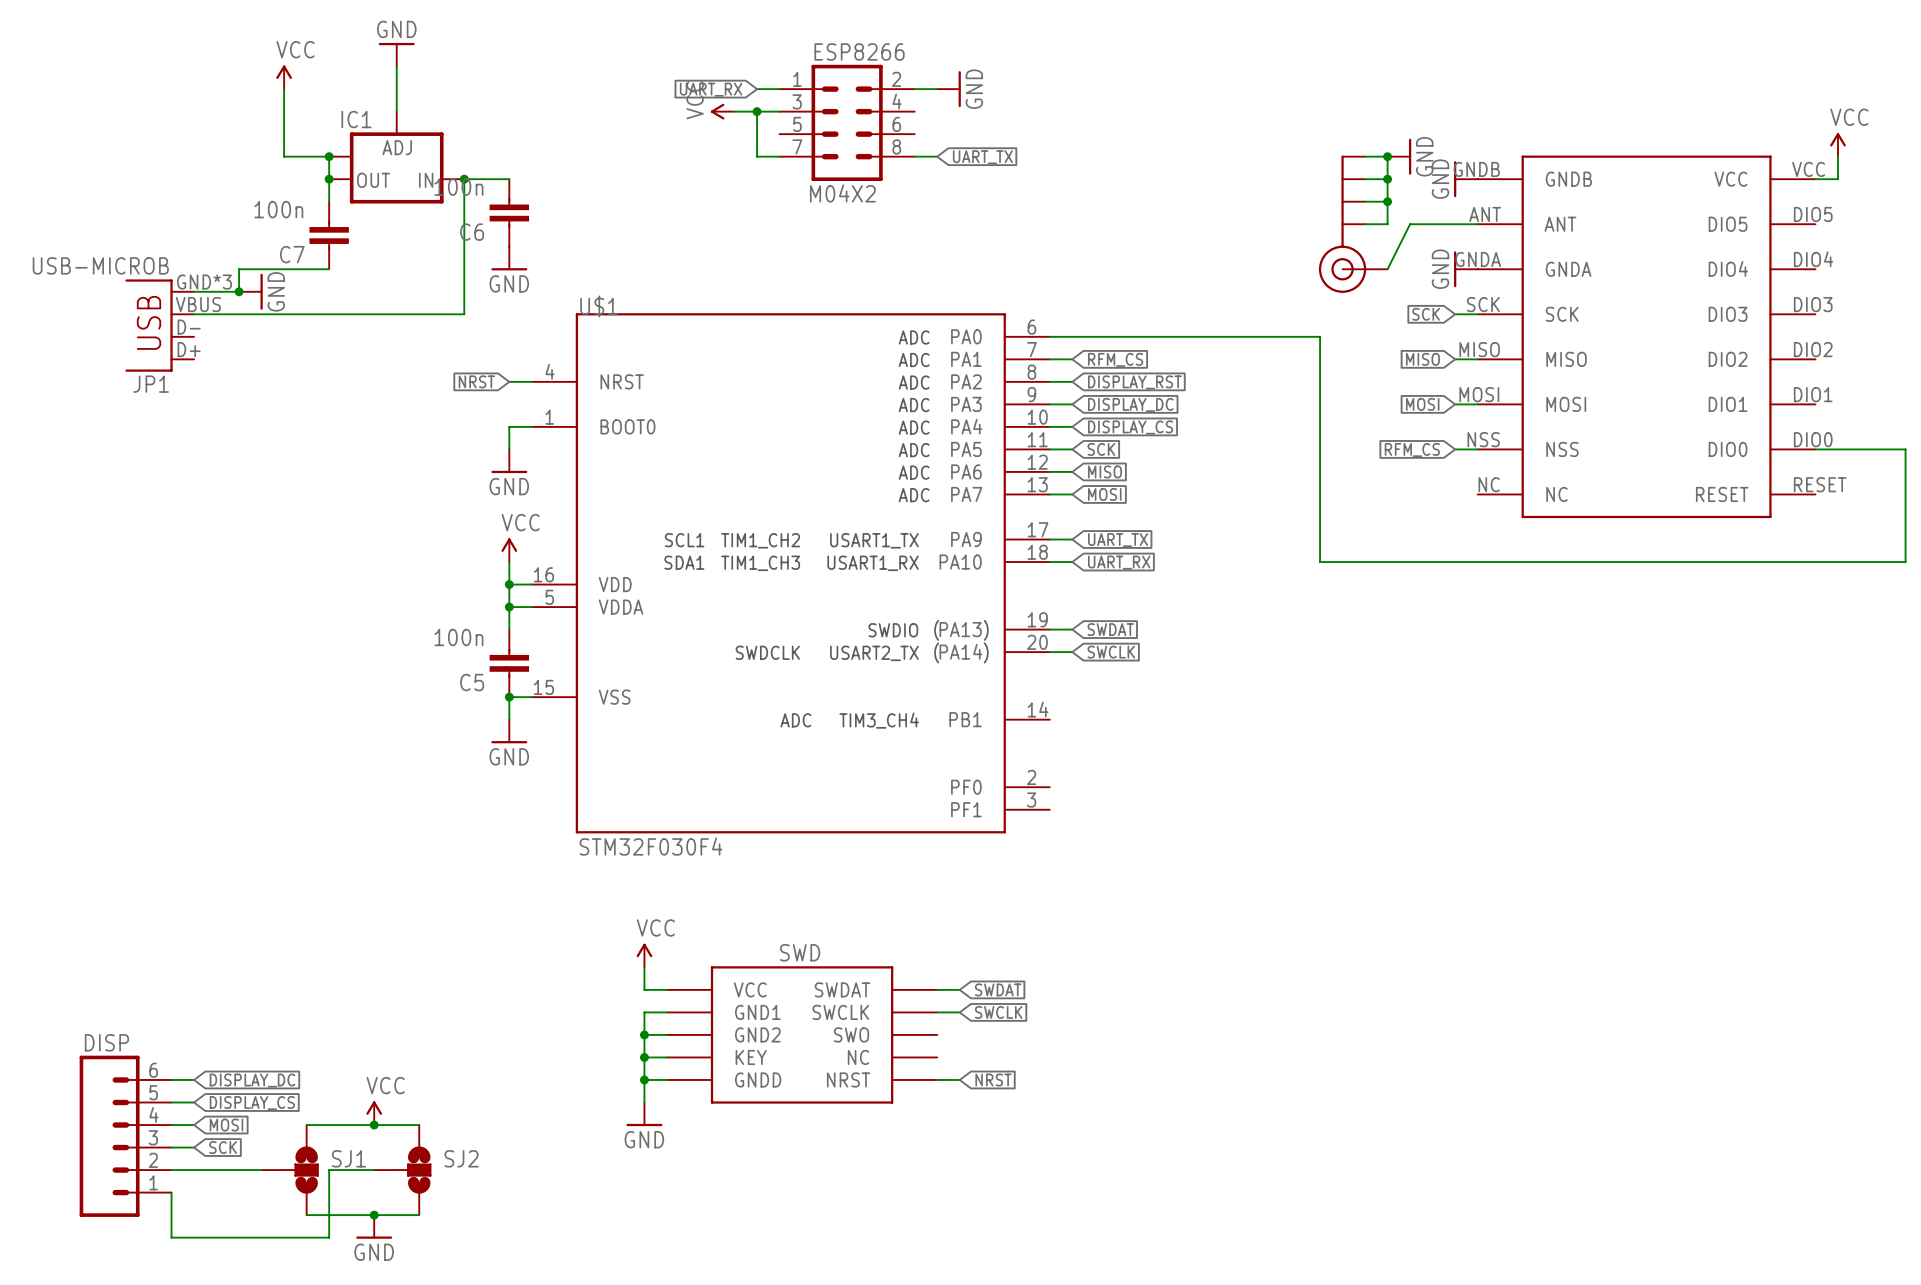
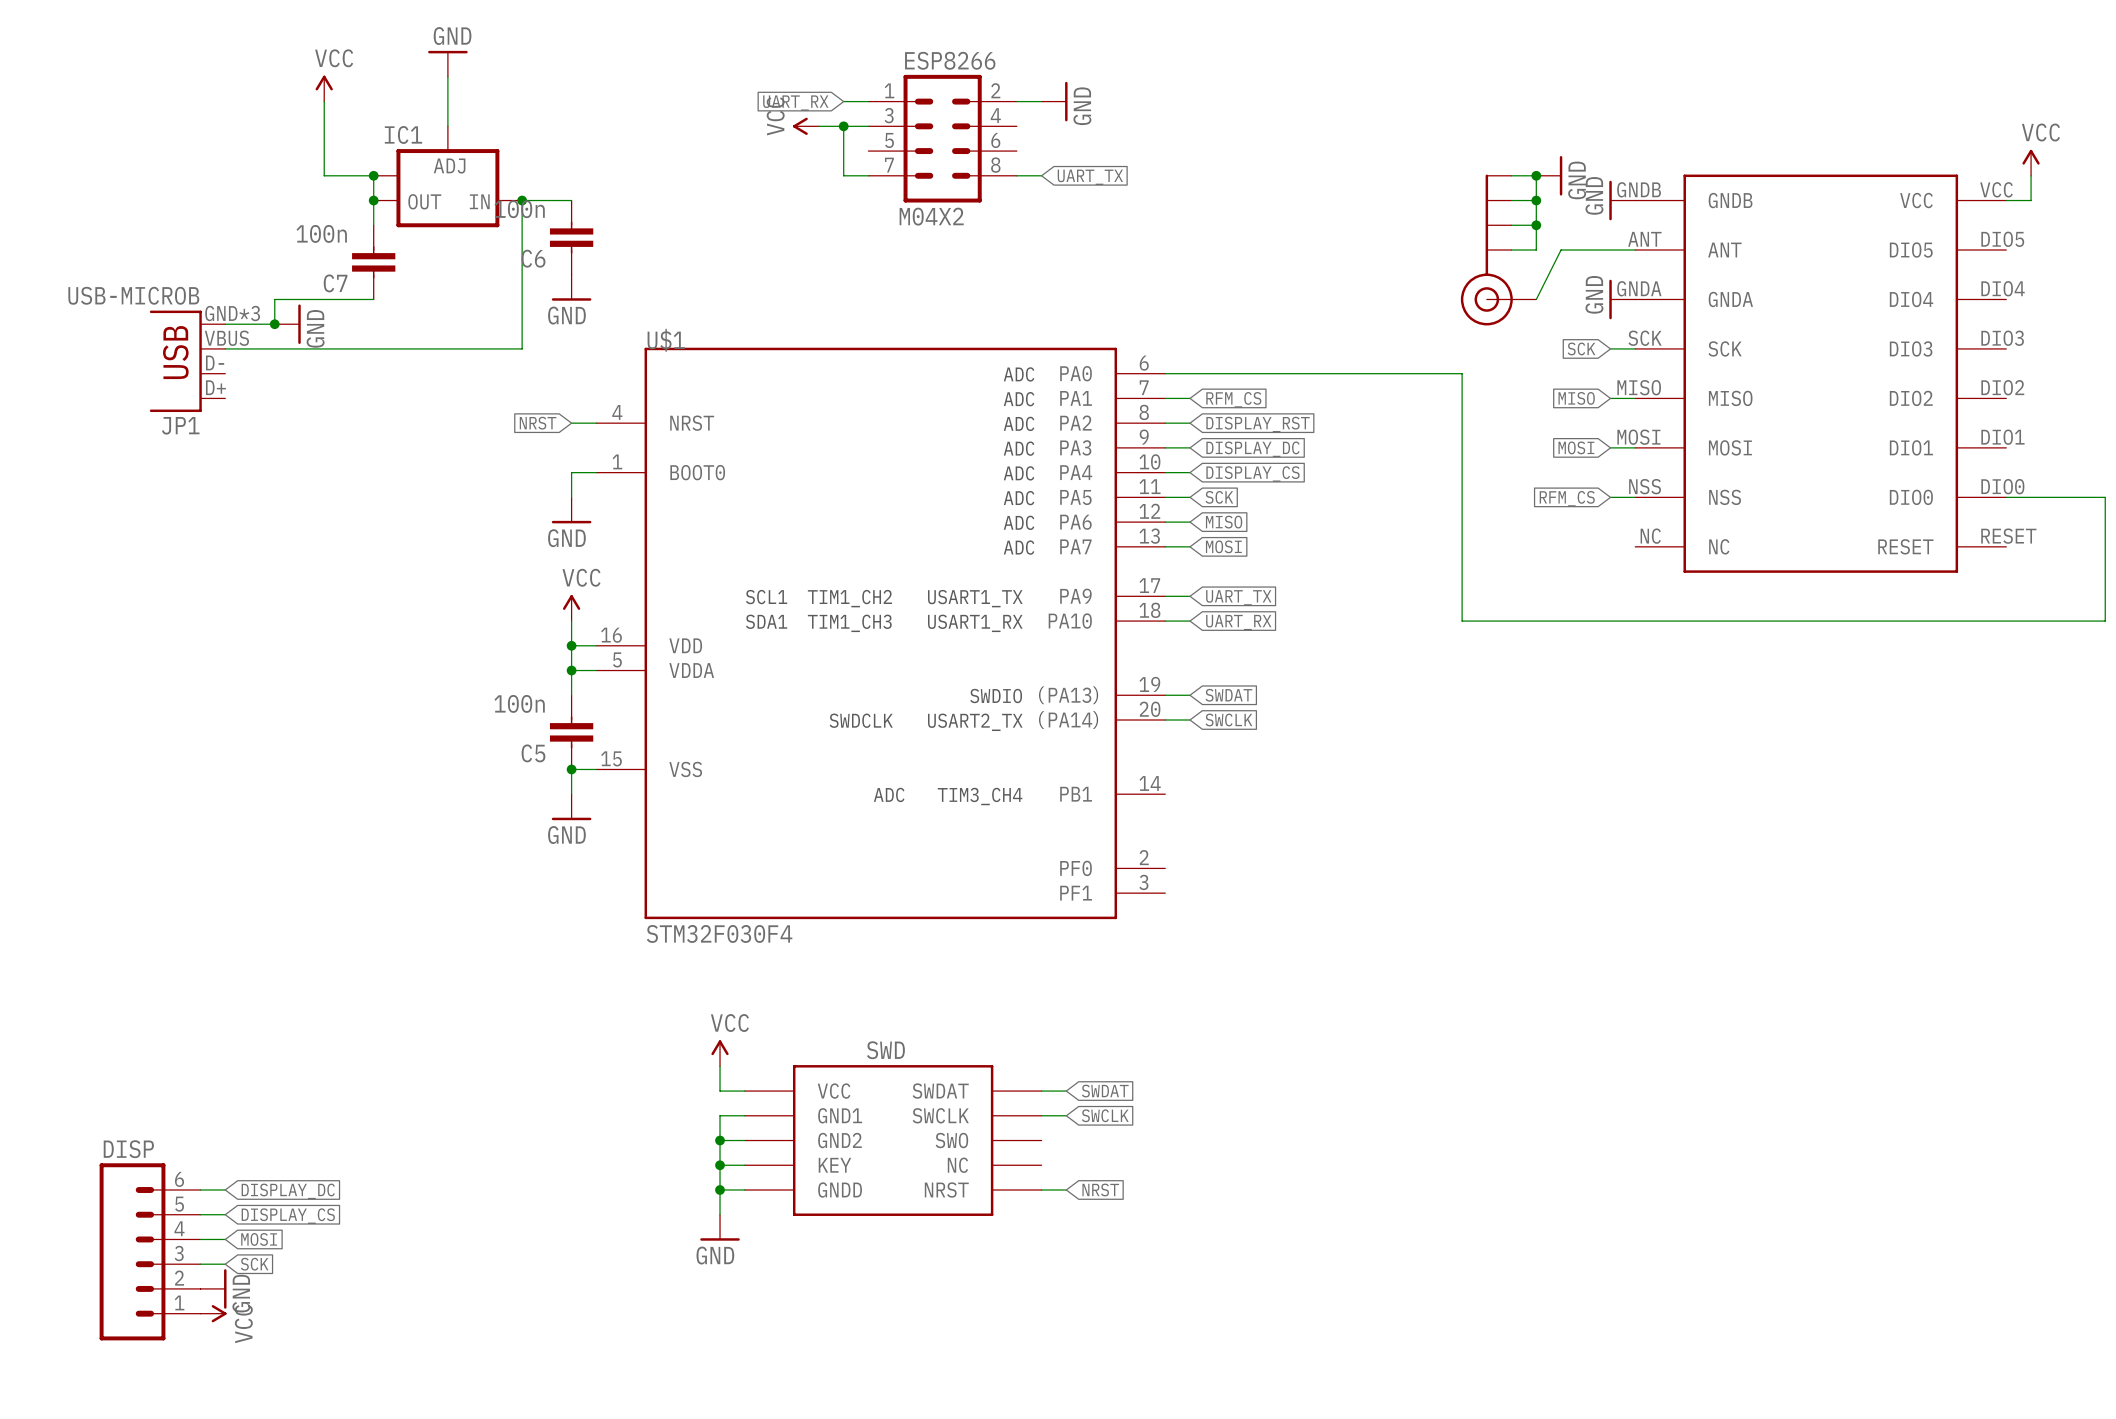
power symbol rotation: 0° (374, 1108) -> 90° clockwise (219, 1313)
power symbol position: VCC (374, 1113) -> VCC (213, 1313)
wire: (306, 1125) (419, 1125) -> none
junction: (374, 1125) -> none
wire: (171, 1170) (261, 1170) -> none
SJ1: (290, 1170) -> none
wire: (374, 1170) (329, 1170) (329, 1237) (171, 1237) (171, 1192) -> none
SJ2: (402, 1170) -> none
wire: (306, 1215) (419, 1215) -> none
junction: (374, 1215) -> none
power symbol position: GND (374, 1226) -> GND (213, 1288)
power symbol rotation: 0° (374, 1237) -> 90° counterclockwise (225, 1288)

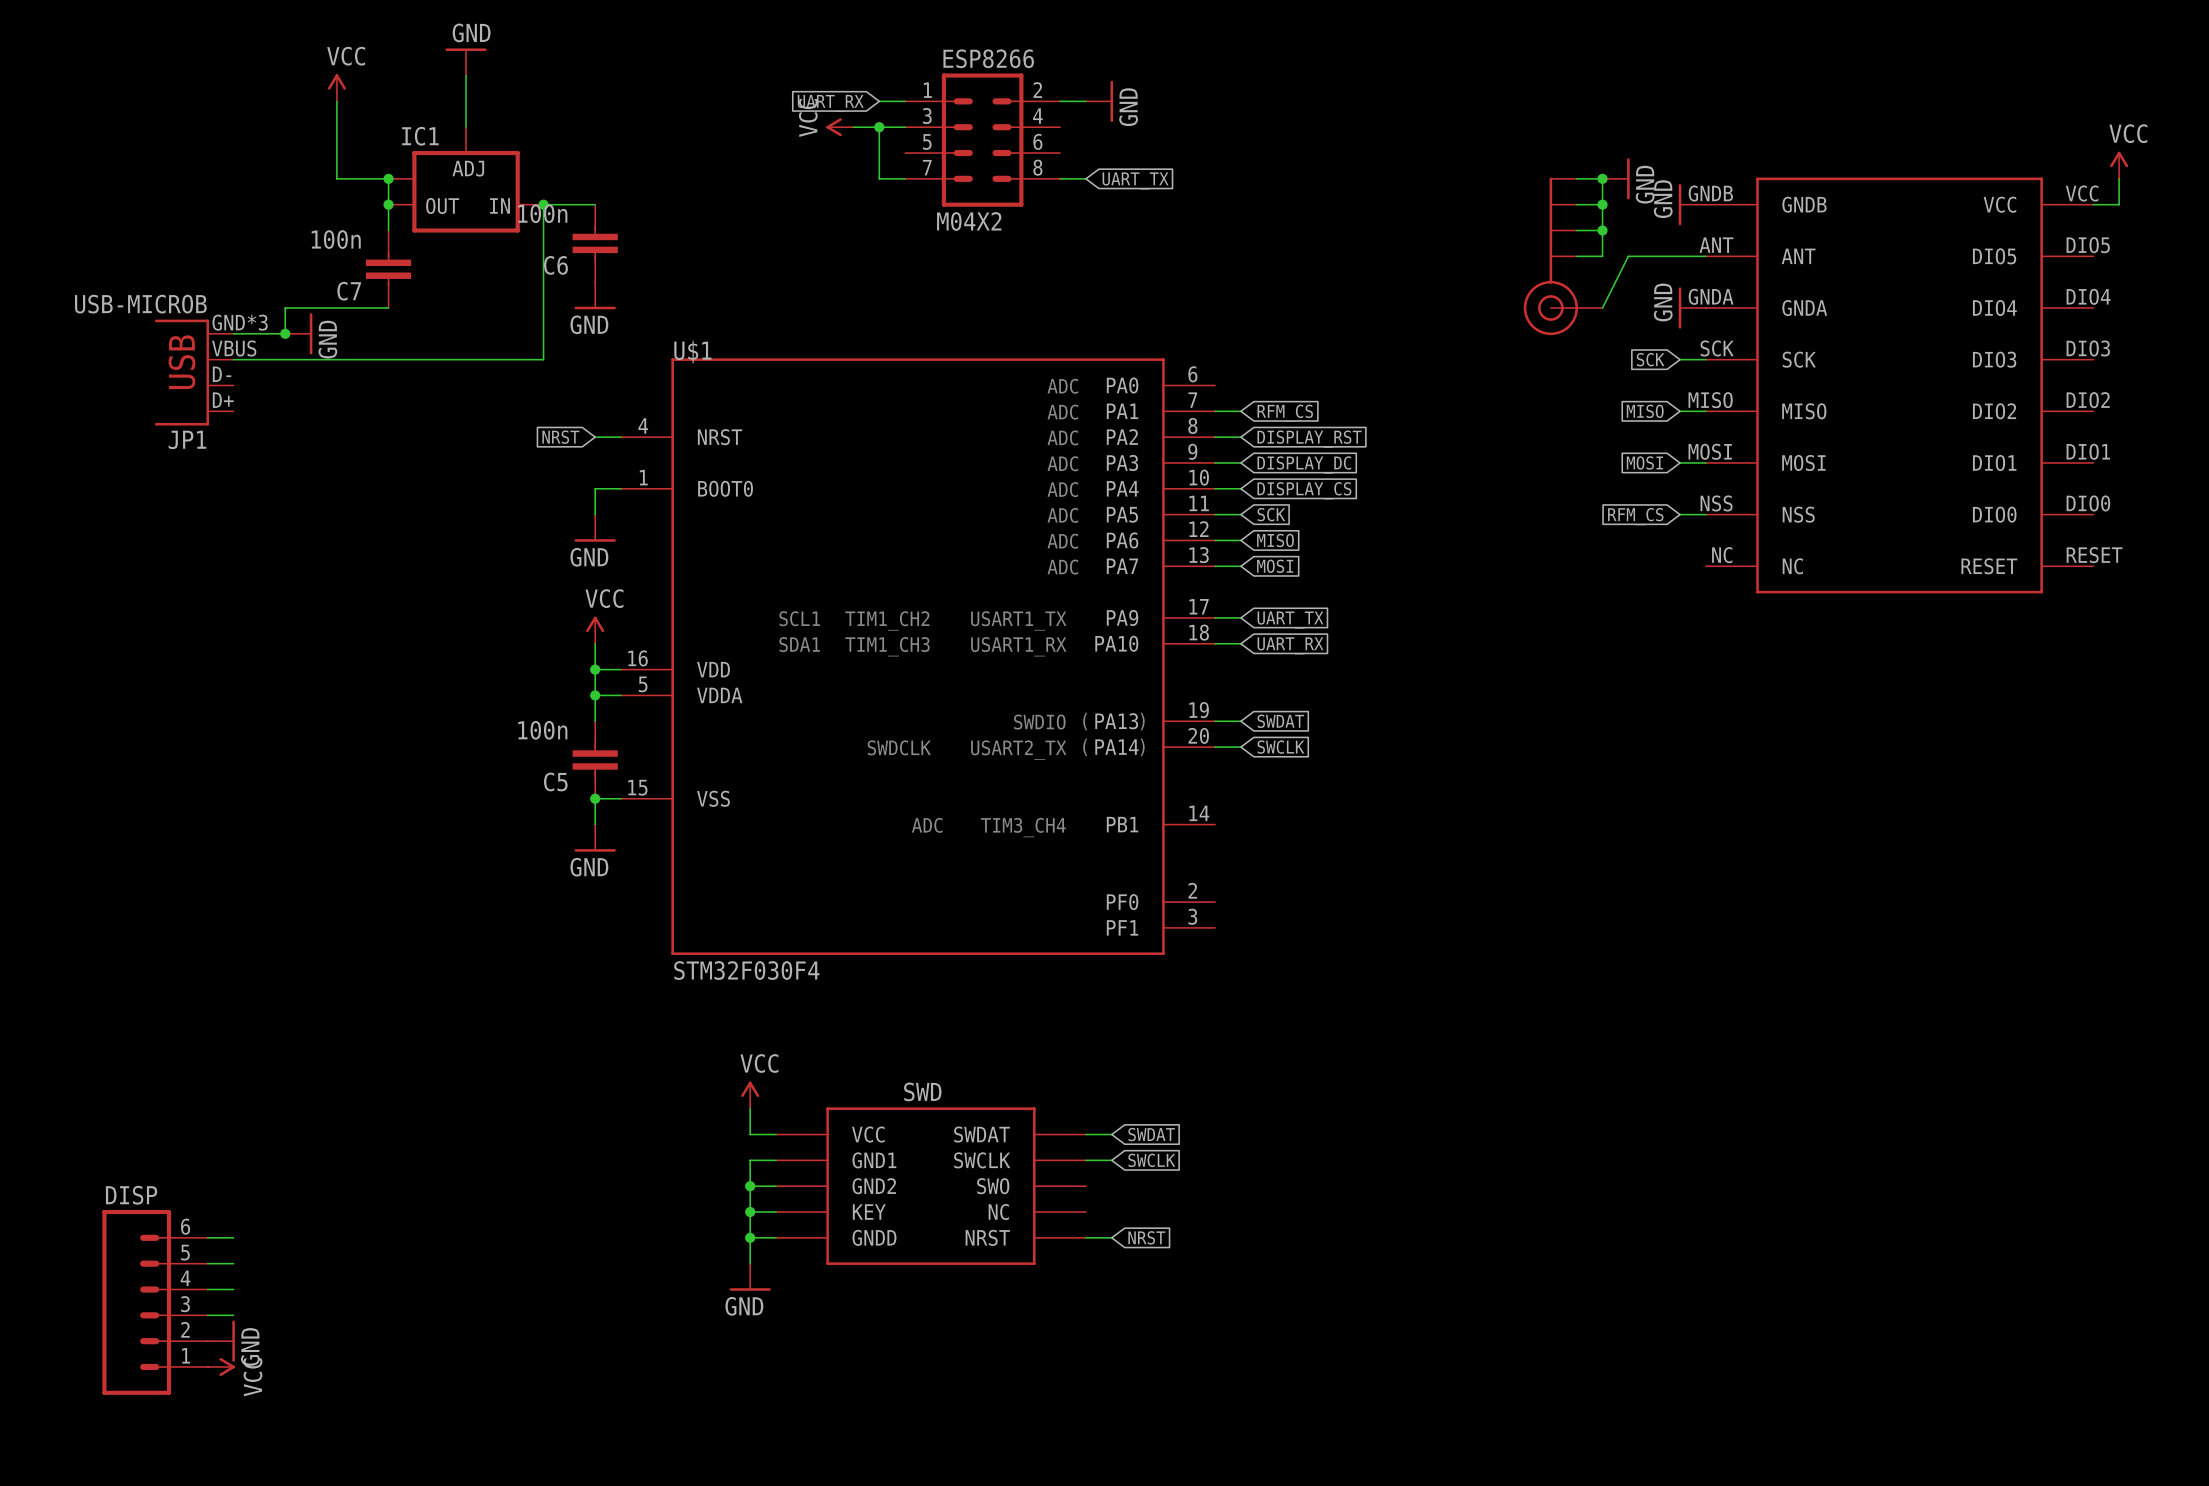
wire: (1165, 373) (1462, 373) (1462, 621) (2105, 621) (2105, 497) (2006, 497) -> none
global label: DISPLAY_DC (288, 1191) -> none
global label: DISPLAY_CS (288, 1216) -> none
global label: MOSI (259, 1239) -> none
global label: SCK (254, 1264) -> none

